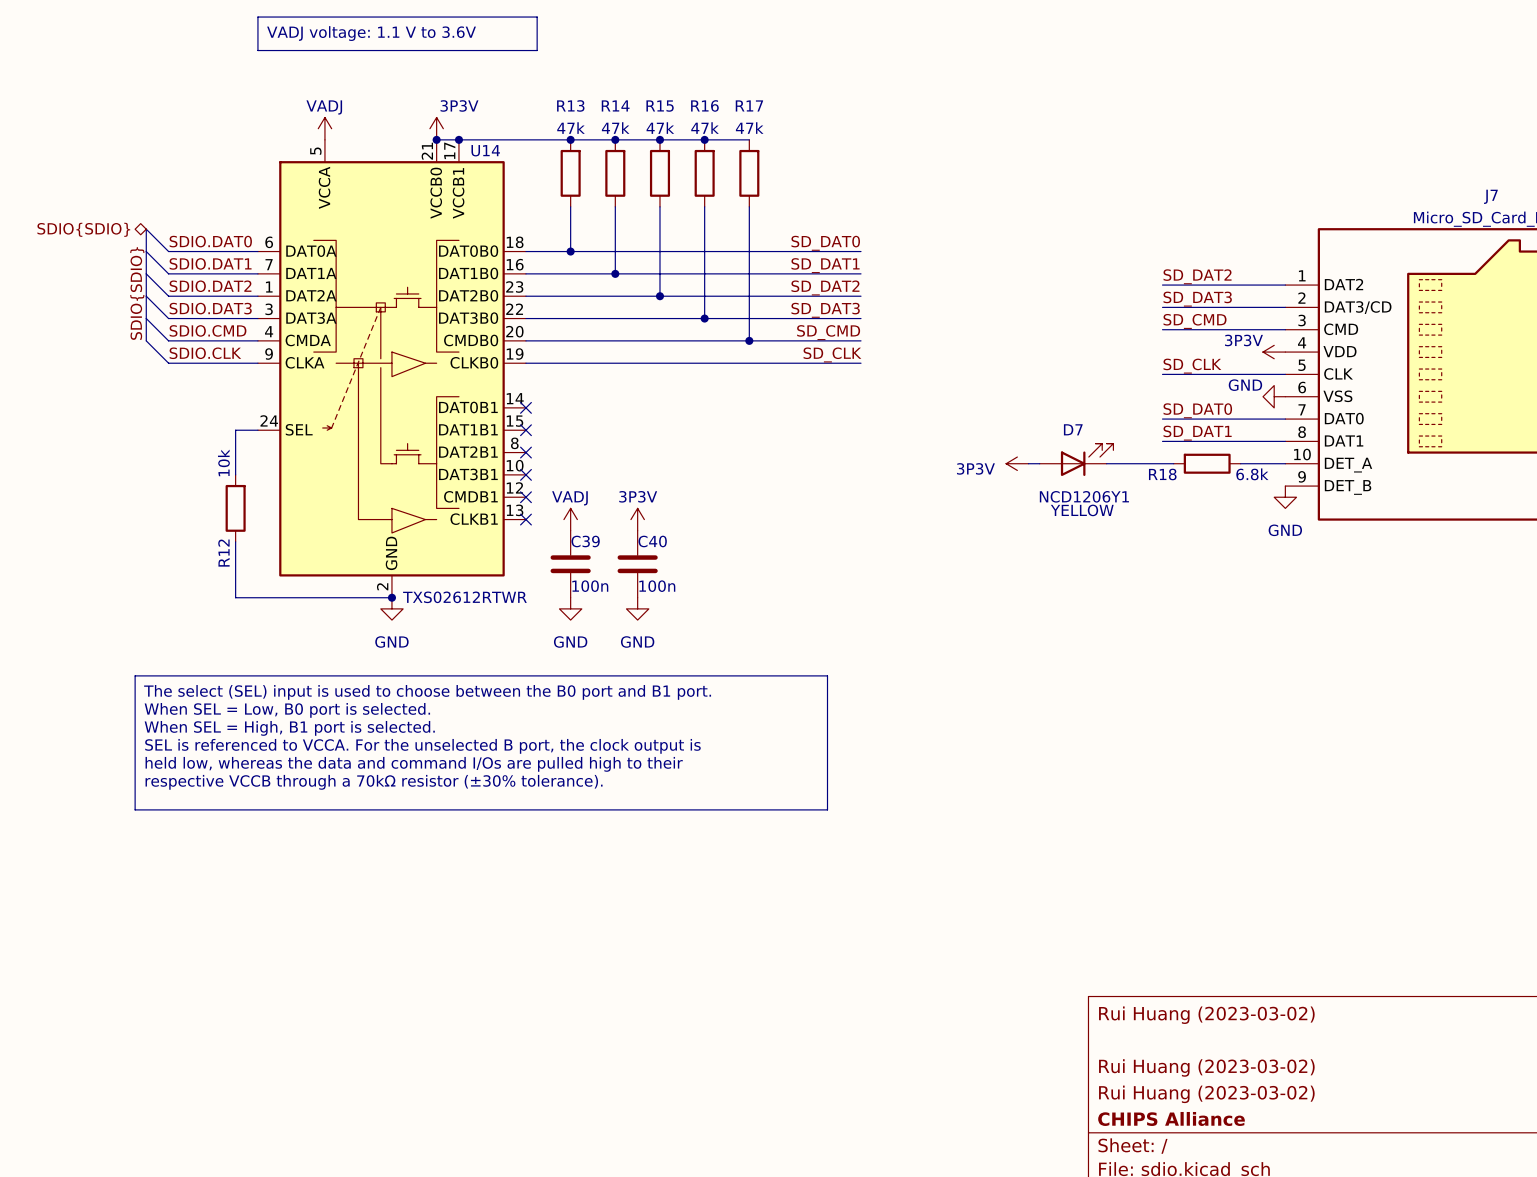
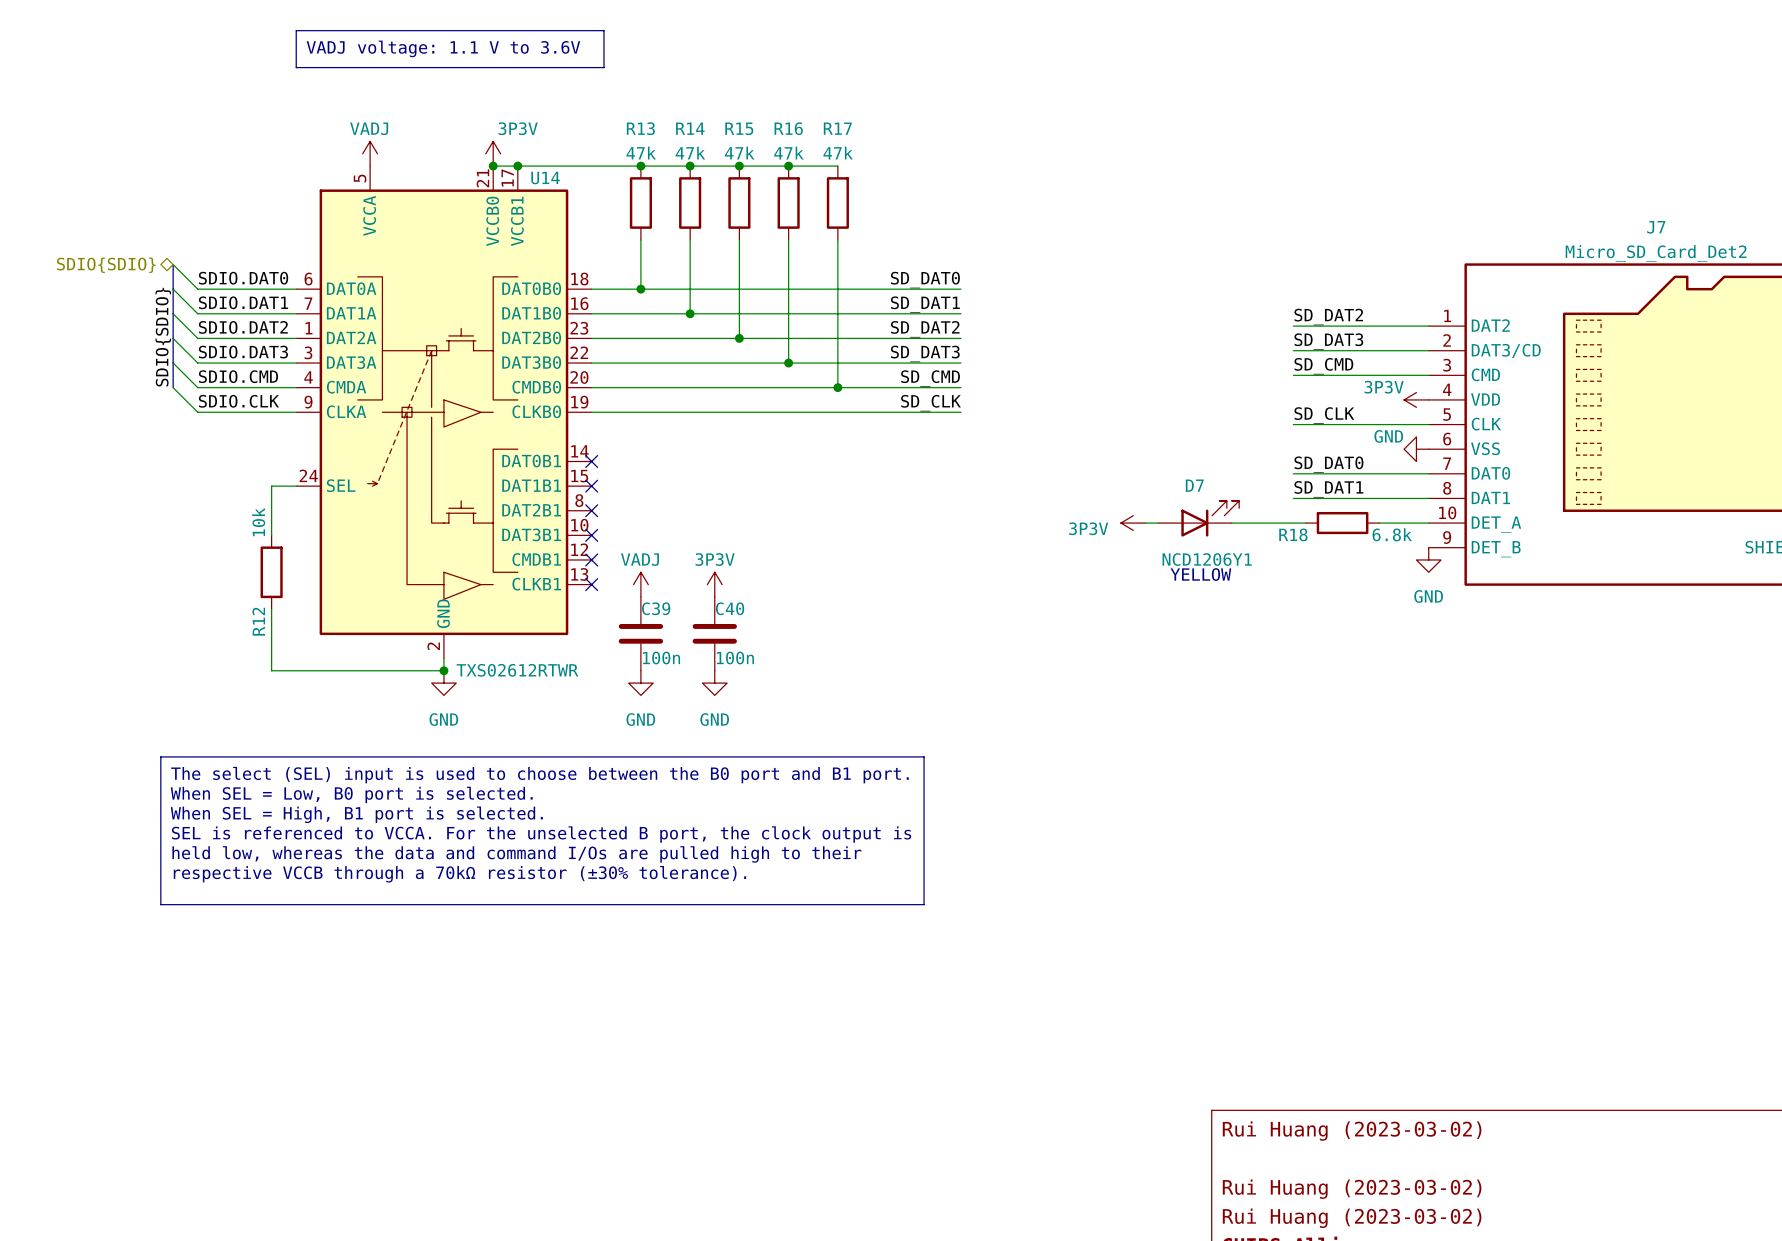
U14 symbol: [257, 139, 526, 598] -> [296, 166, 592, 659]

